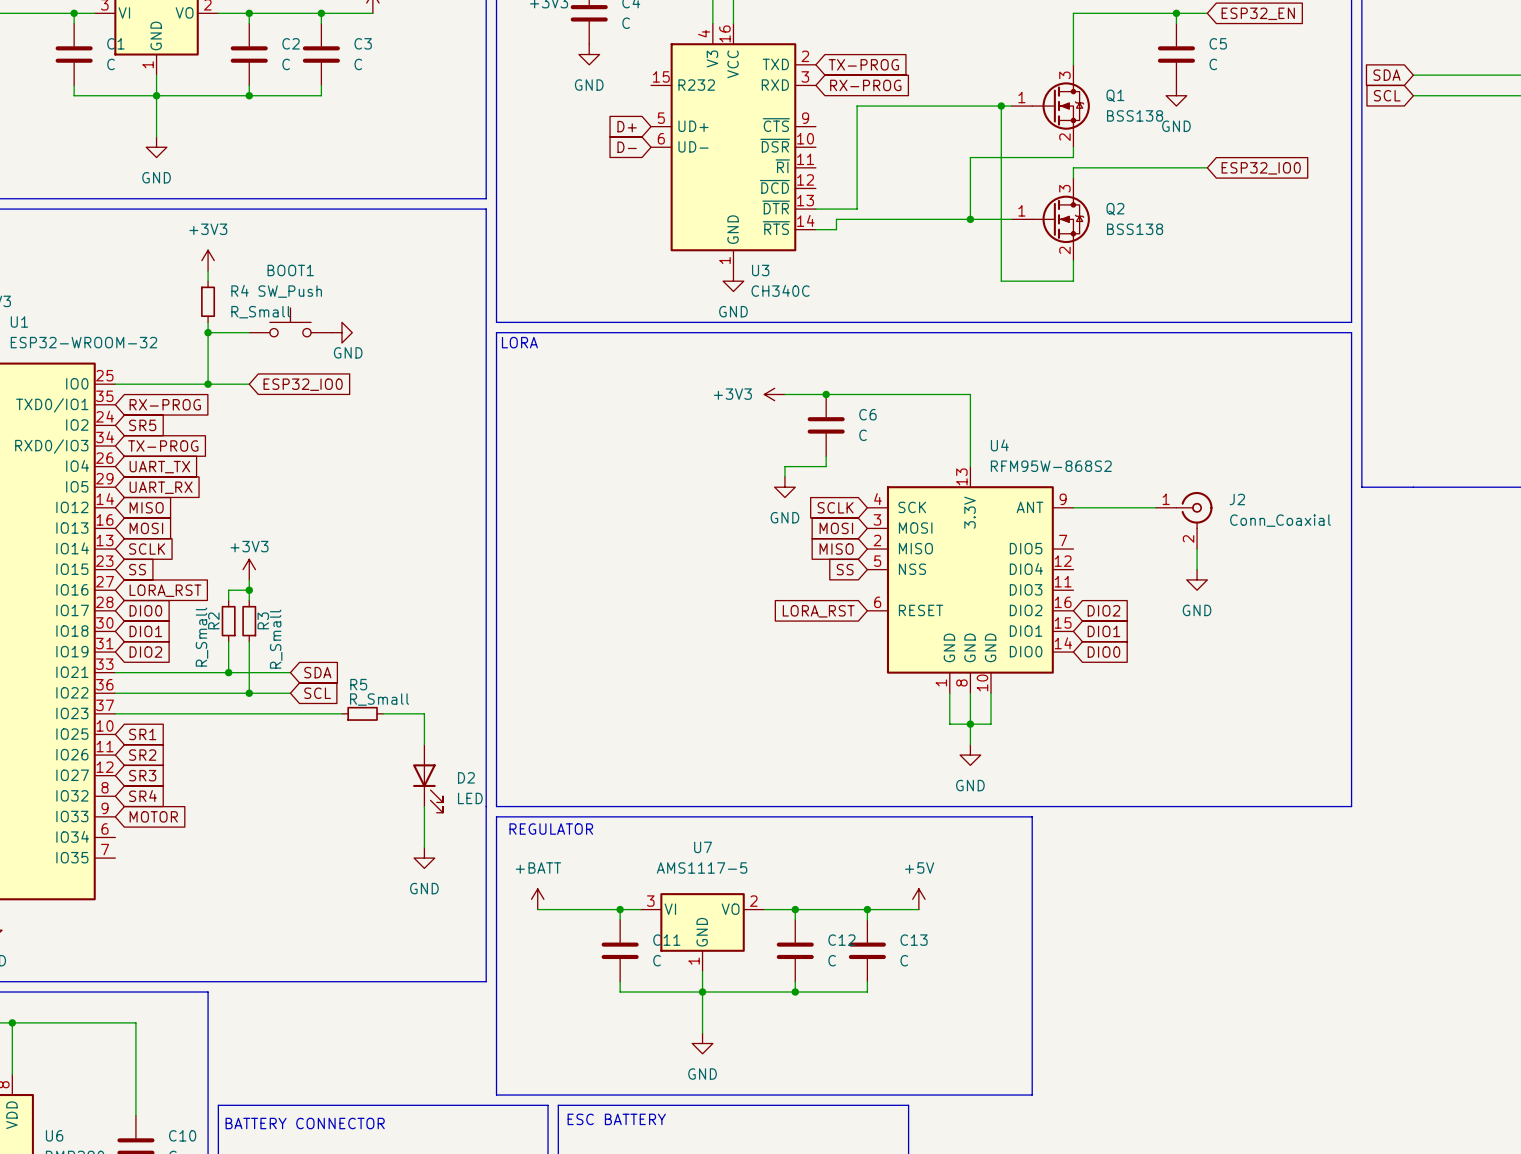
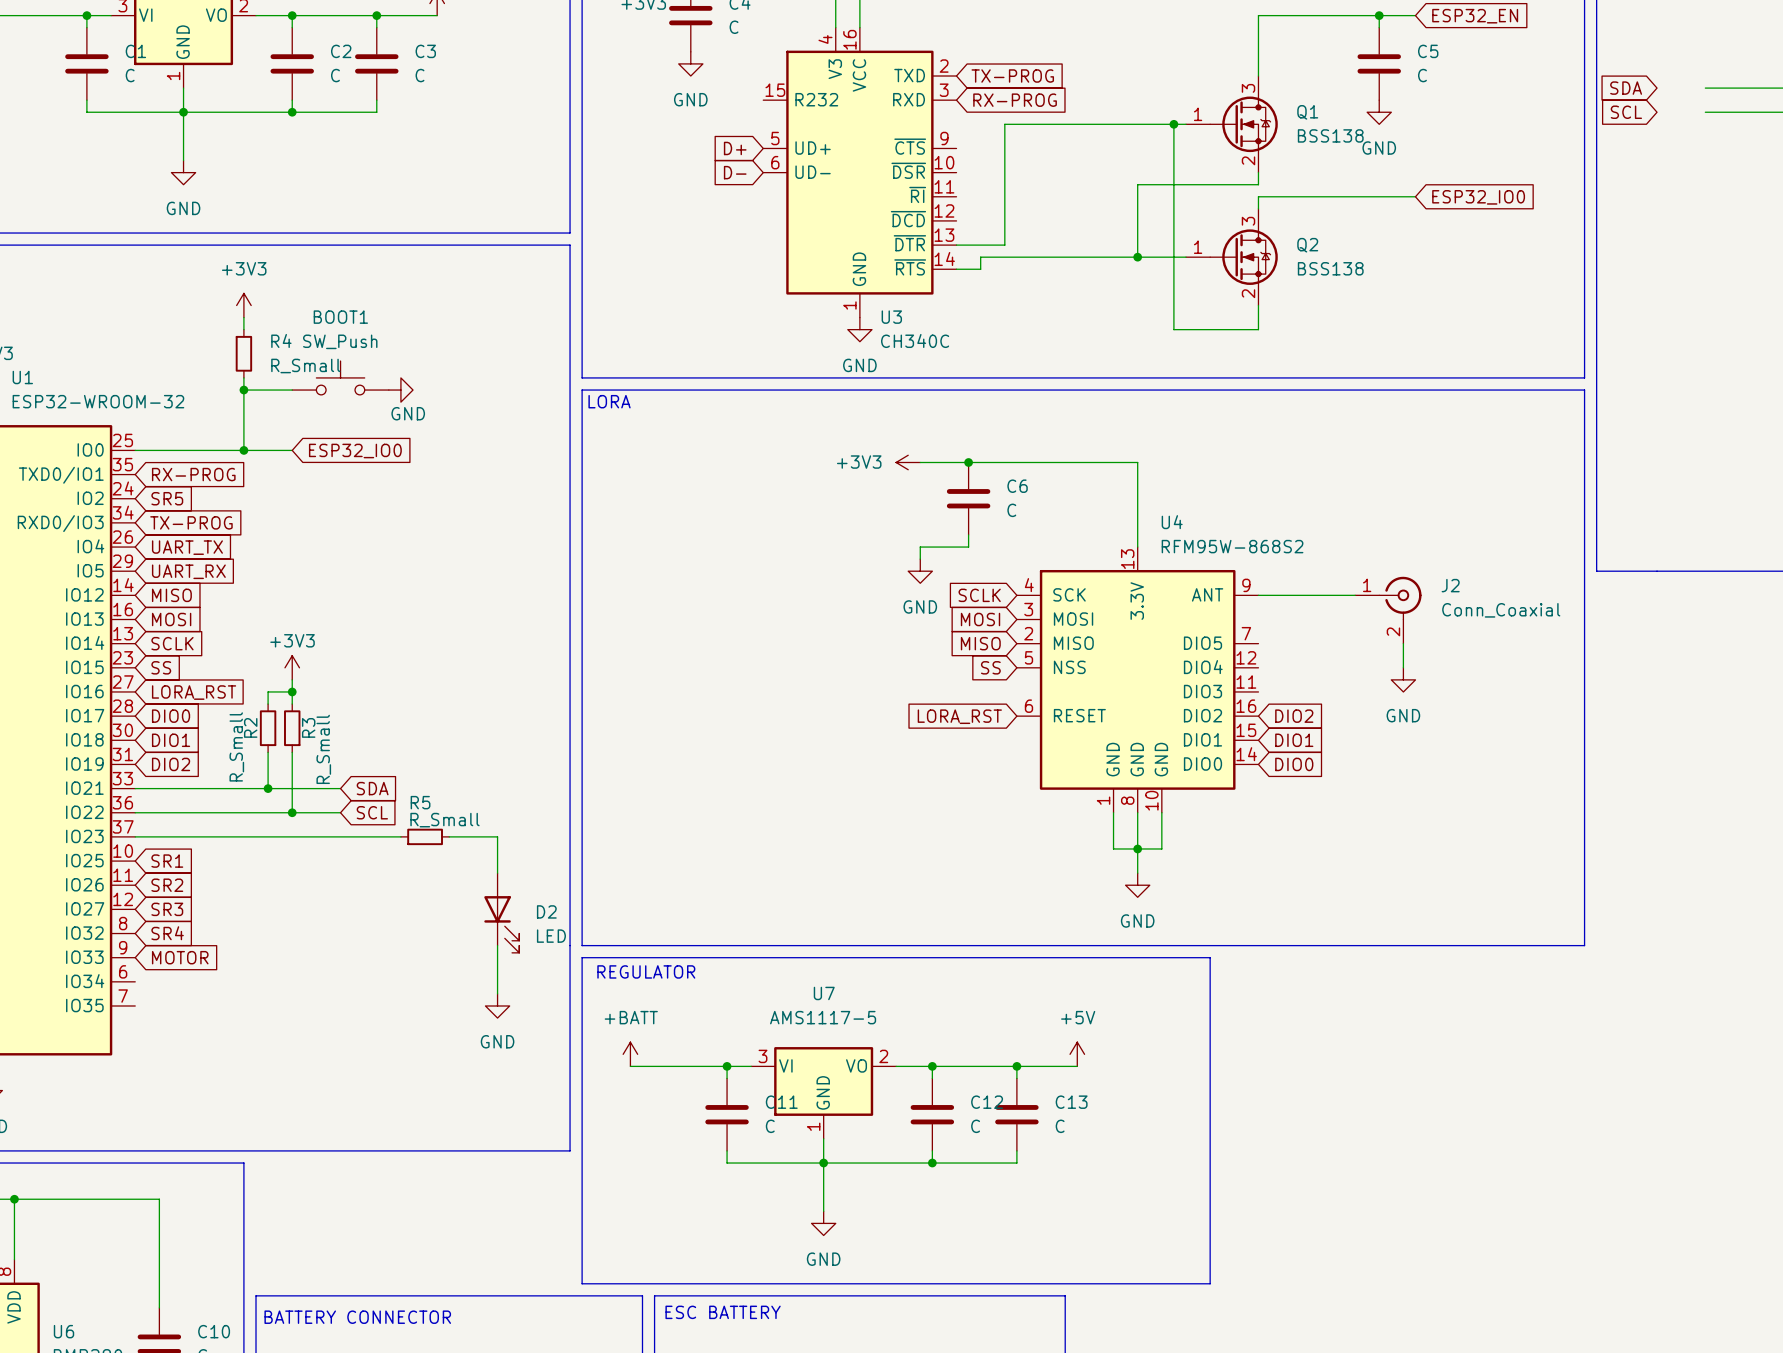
wire: (1413, 75) (1454, 75) -> none
wire: (1413, 95) (1454, 95) -> none

